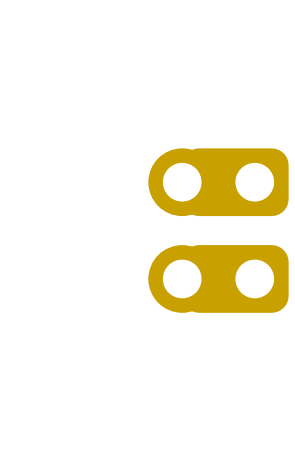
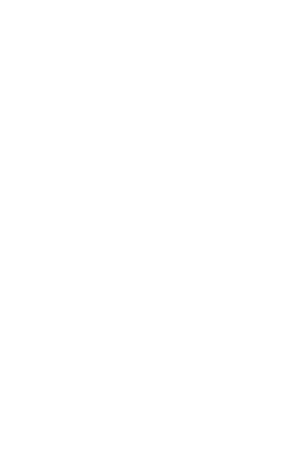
part: (218, 182) -> none
part: (218, 278) -> none

